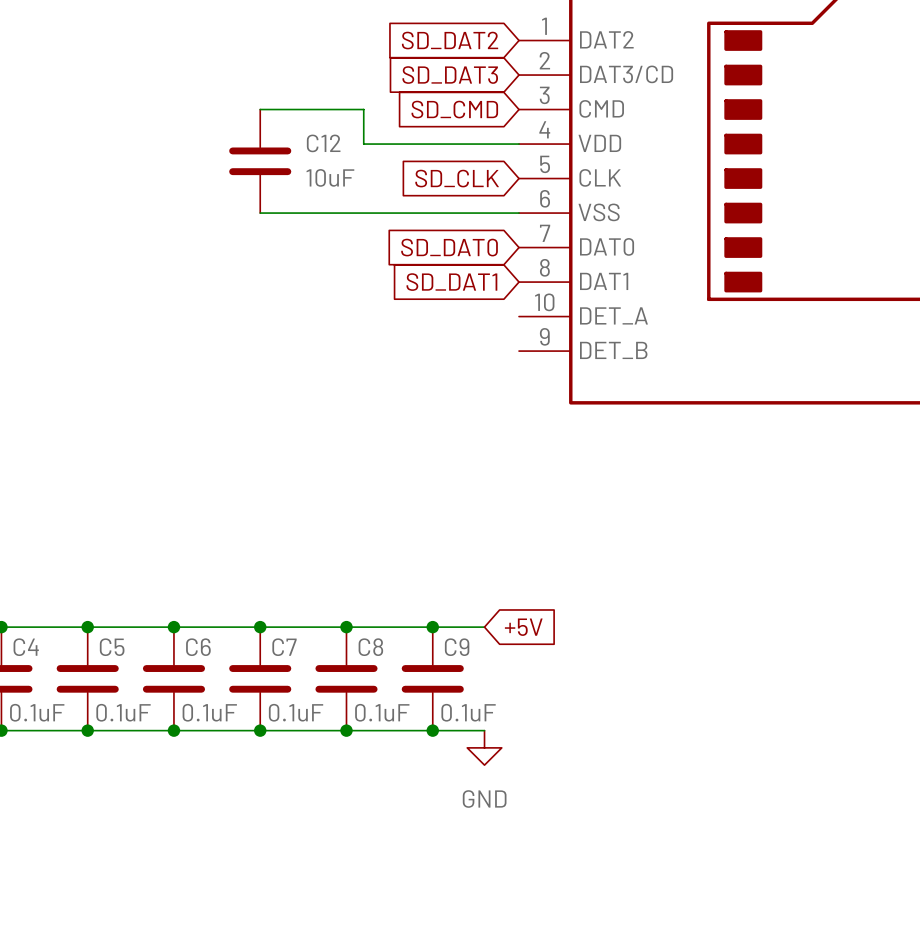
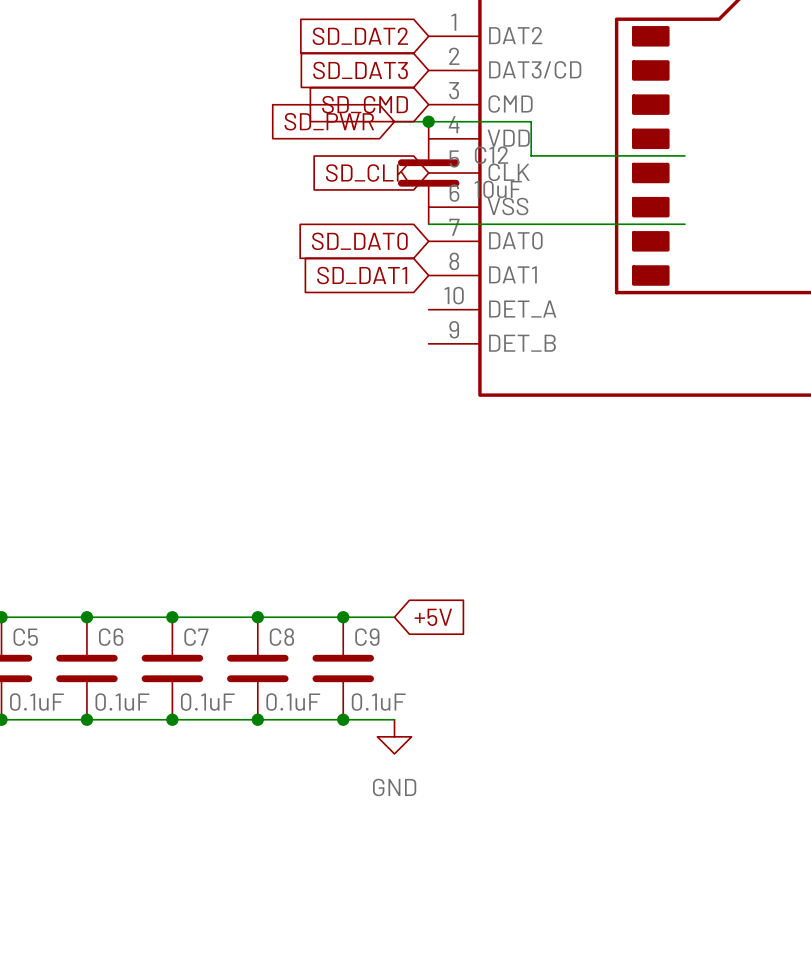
wire: (260, 109) (363, 109) (363, 144) (519, 144) -> none
global label: none -> SD_PWR (329, 121)
wire: none -> (394, 121) (531, 121) (531, 155) (684, 155)
junction: none -> (428, 121)
C12 position: (260, 161) -> (428, 172)
wire: (260, 213) (519, 213) -> (428, 224) (684, 224)

